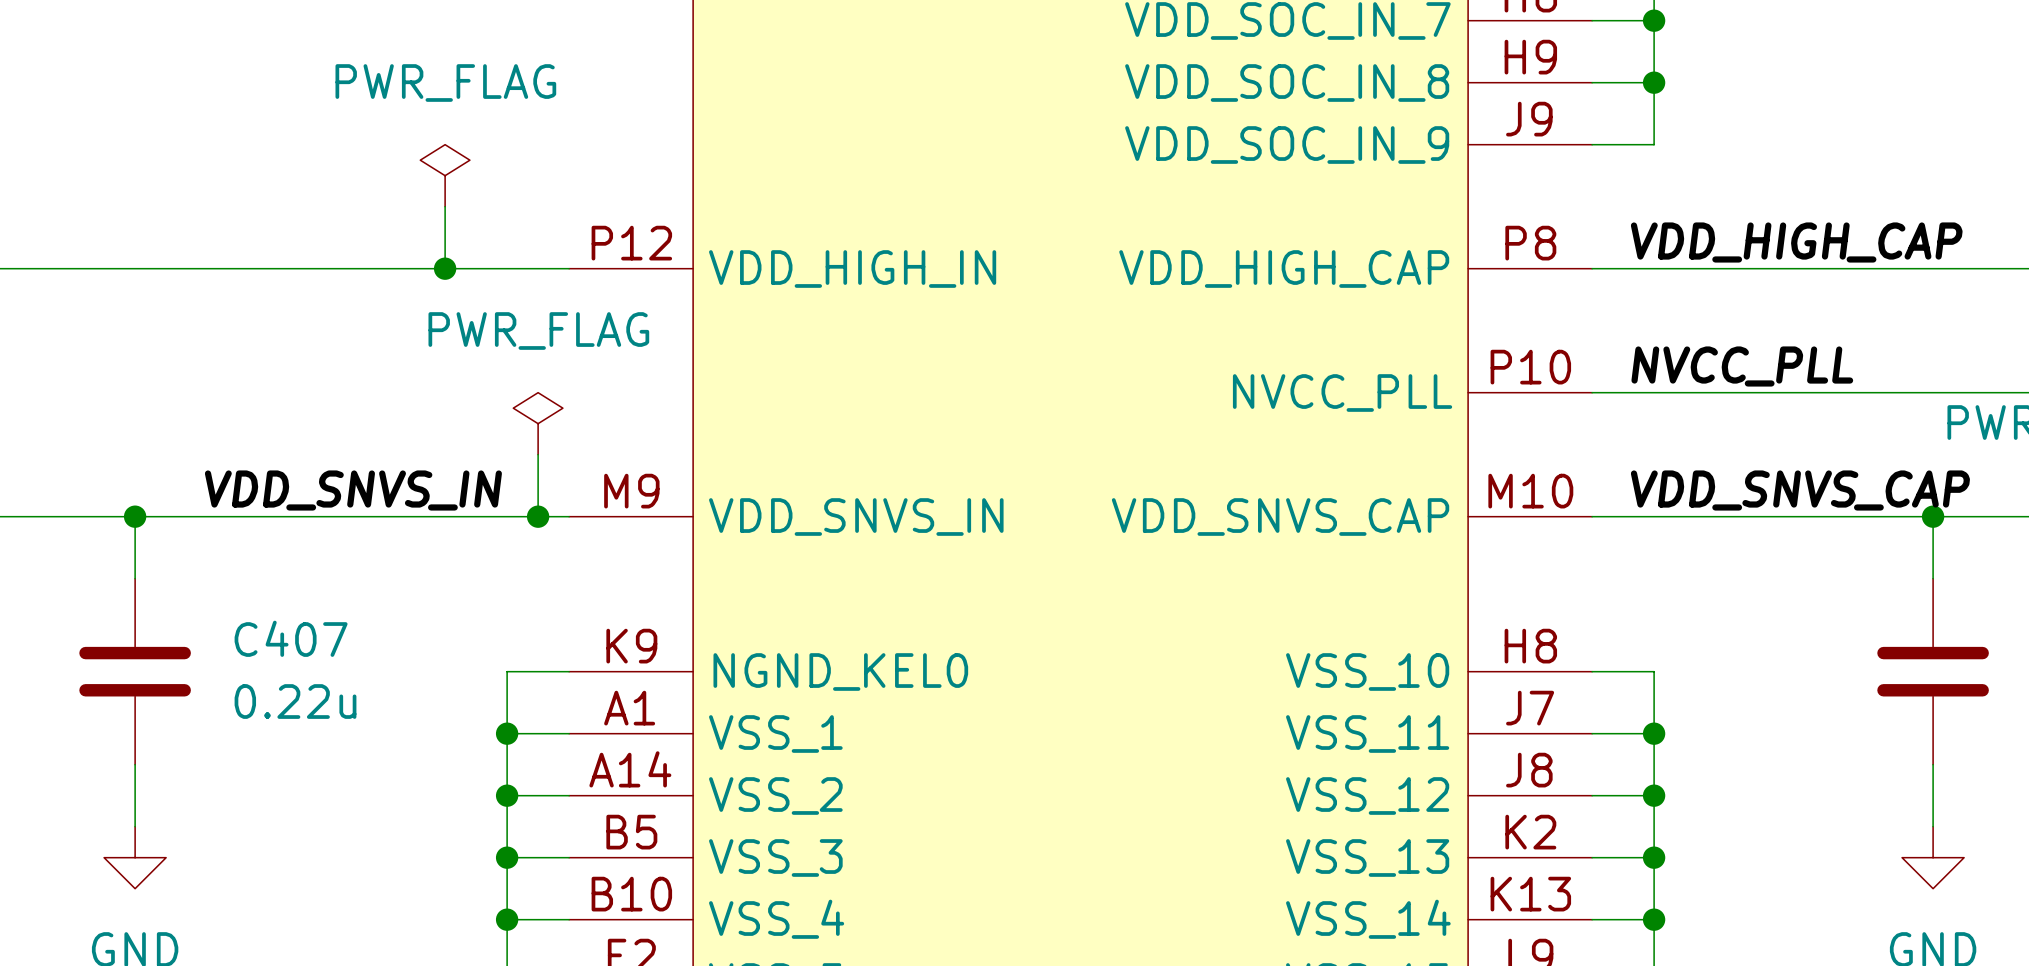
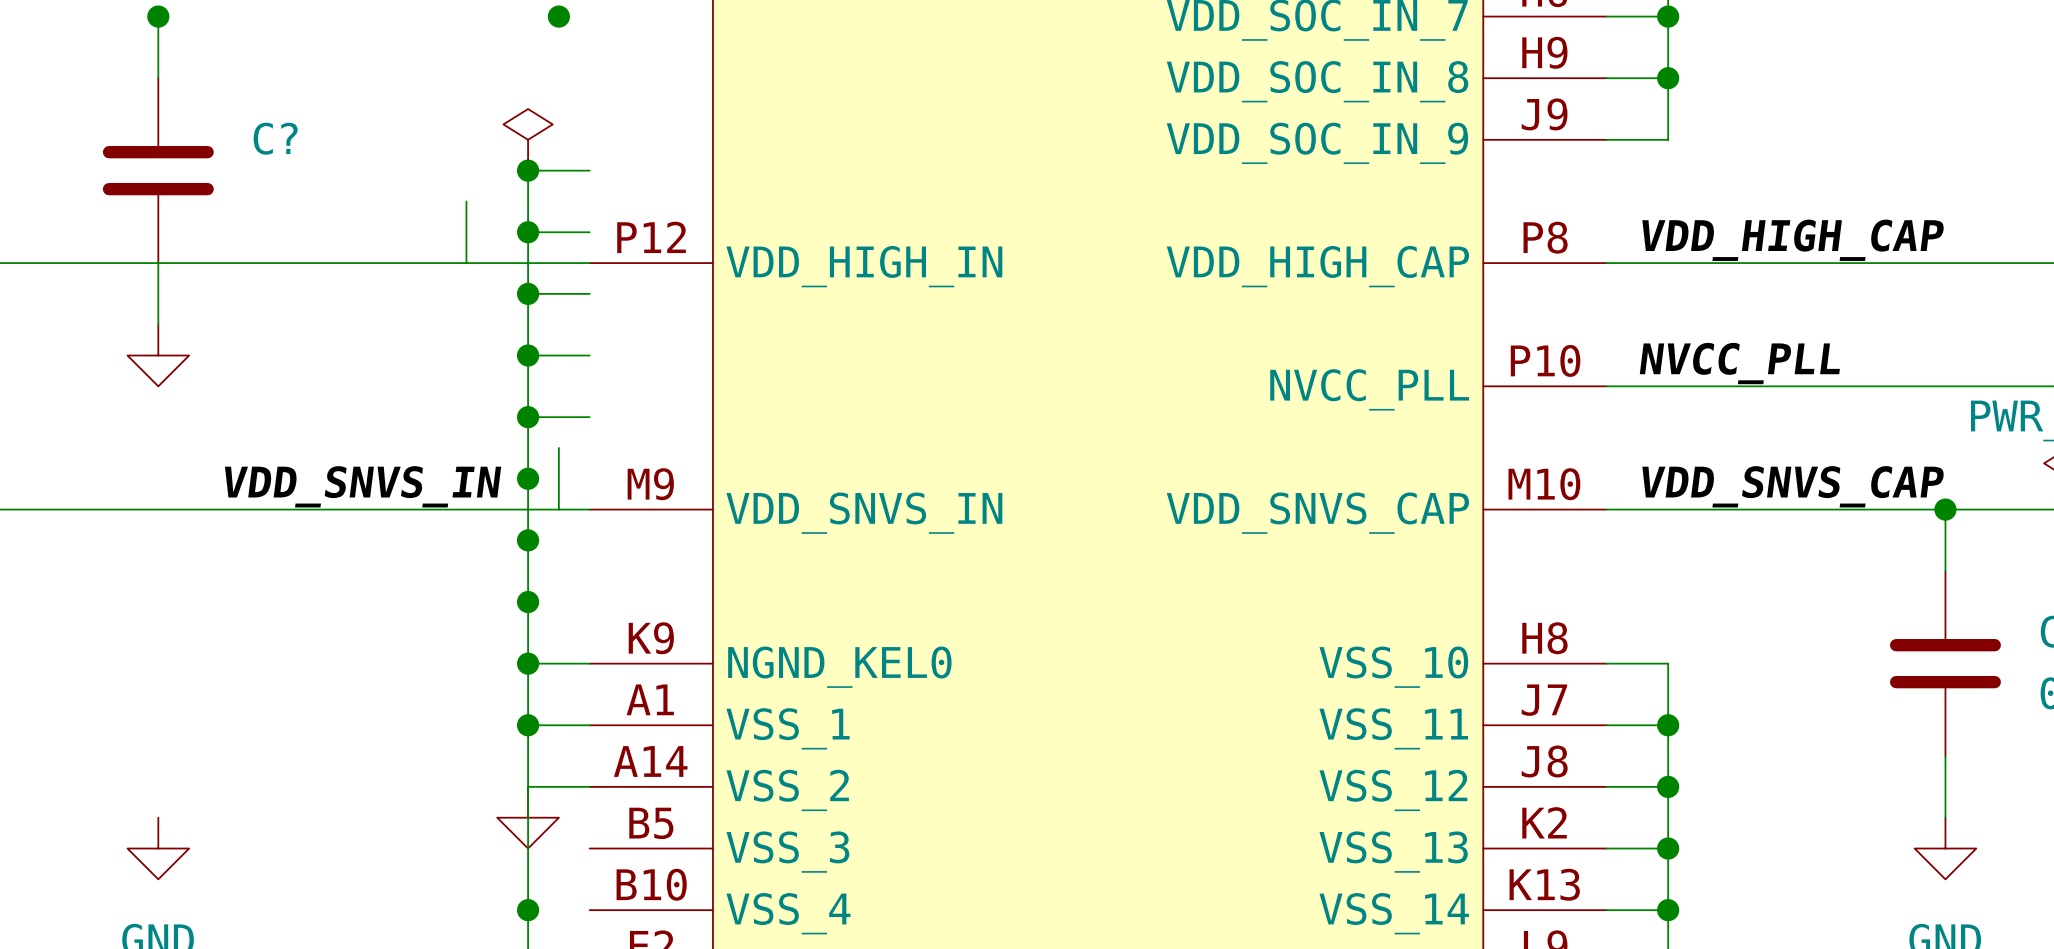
junction: none -> (158, 16)
junction: none -> (558, 16)
power symbol: none -> (528, 139)
C?: none -> (158, 170)
power symbol: PWR_FLAG (445, 175) -> none
junction: none -> (528, 170)
wire: none -> (589, 170) (528, 170) (528, 663)
wire: none -> (528, 232) (589, 232)
junction: none -> (528, 232)
junction: (445, 268) -> none
wire: none -> (528, 293) (589, 293)
junction: none -> (528, 293)
power symbol: none -> (158, 355)
junction: none -> (528, 355)
junction: none -> (528, 417)
power symbol: PWR_FLAG (538, 423) -> none
junction: none -> (528, 478)
wire: (135, 516) (135, 578) -> (158, 16) (158, 78)
junction: (135, 516) -> none
junction: (538, 516) -> none
junction: none -> (528, 540)
junction: none -> (528, 602)
C407: 0.22u (135, 671) -> none
junction: none -> (528, 663)
wire: (135, 764) (135, 826) -> (158, 263) (158, 324)
junction: (507, 795) -> none
power symbol: none -> (528, 817)
wire: (507, 857) (569, 857) -> (528, 355) (589, 355)
junction: (507, 857) -> none
wire: (507, 919) (569, 919) -> (528, 417) (589, 417)

